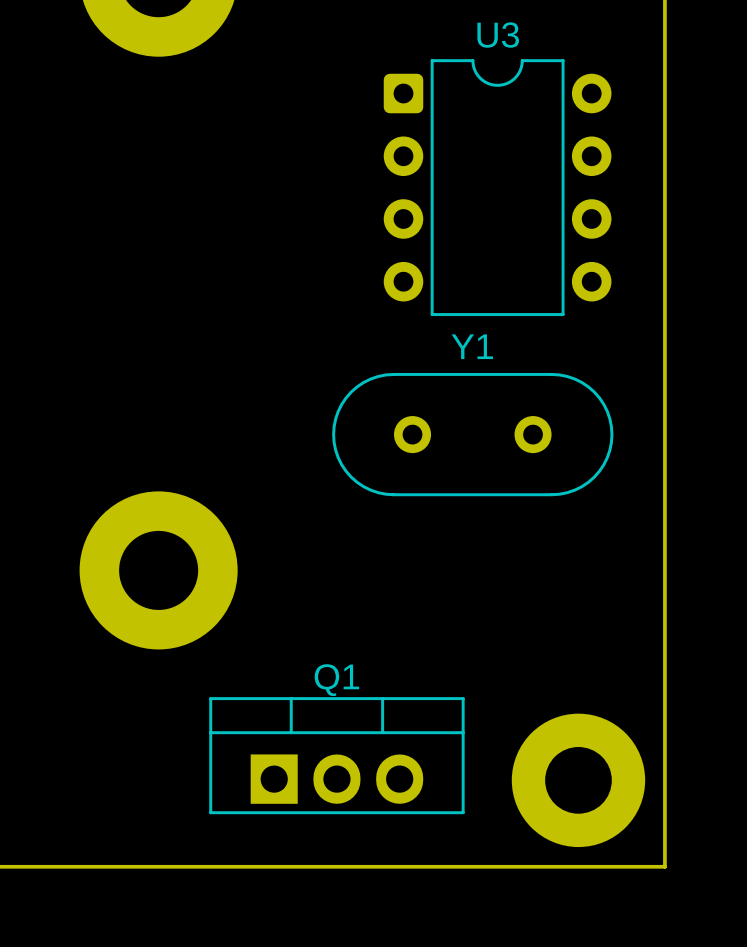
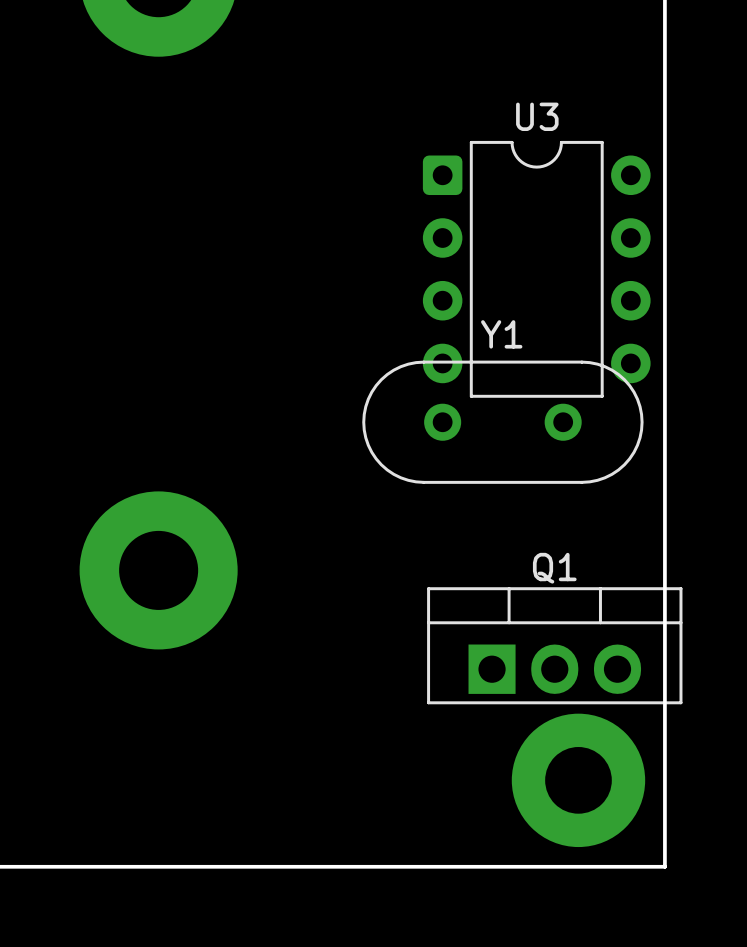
U3 position: (497, 187) -> (536, 269)
Y1 position: (472, 434) -> (502, 422)
Q1 position: (336, 755) -> (554, 645)

